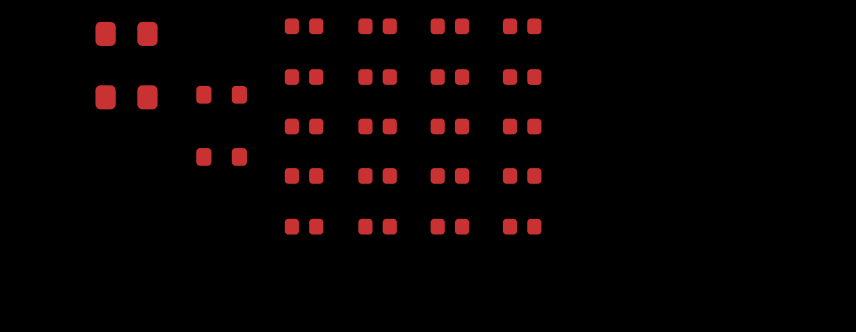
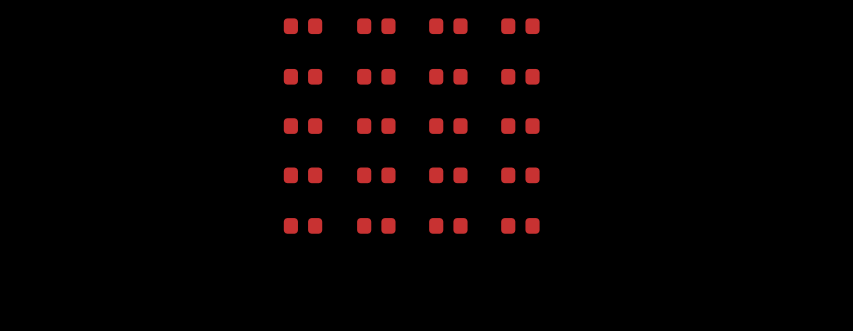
part: (126, 33) -> none
part: (221, 94) -> none
part: (126, 97) -> none
part: (221, 156) -> none

